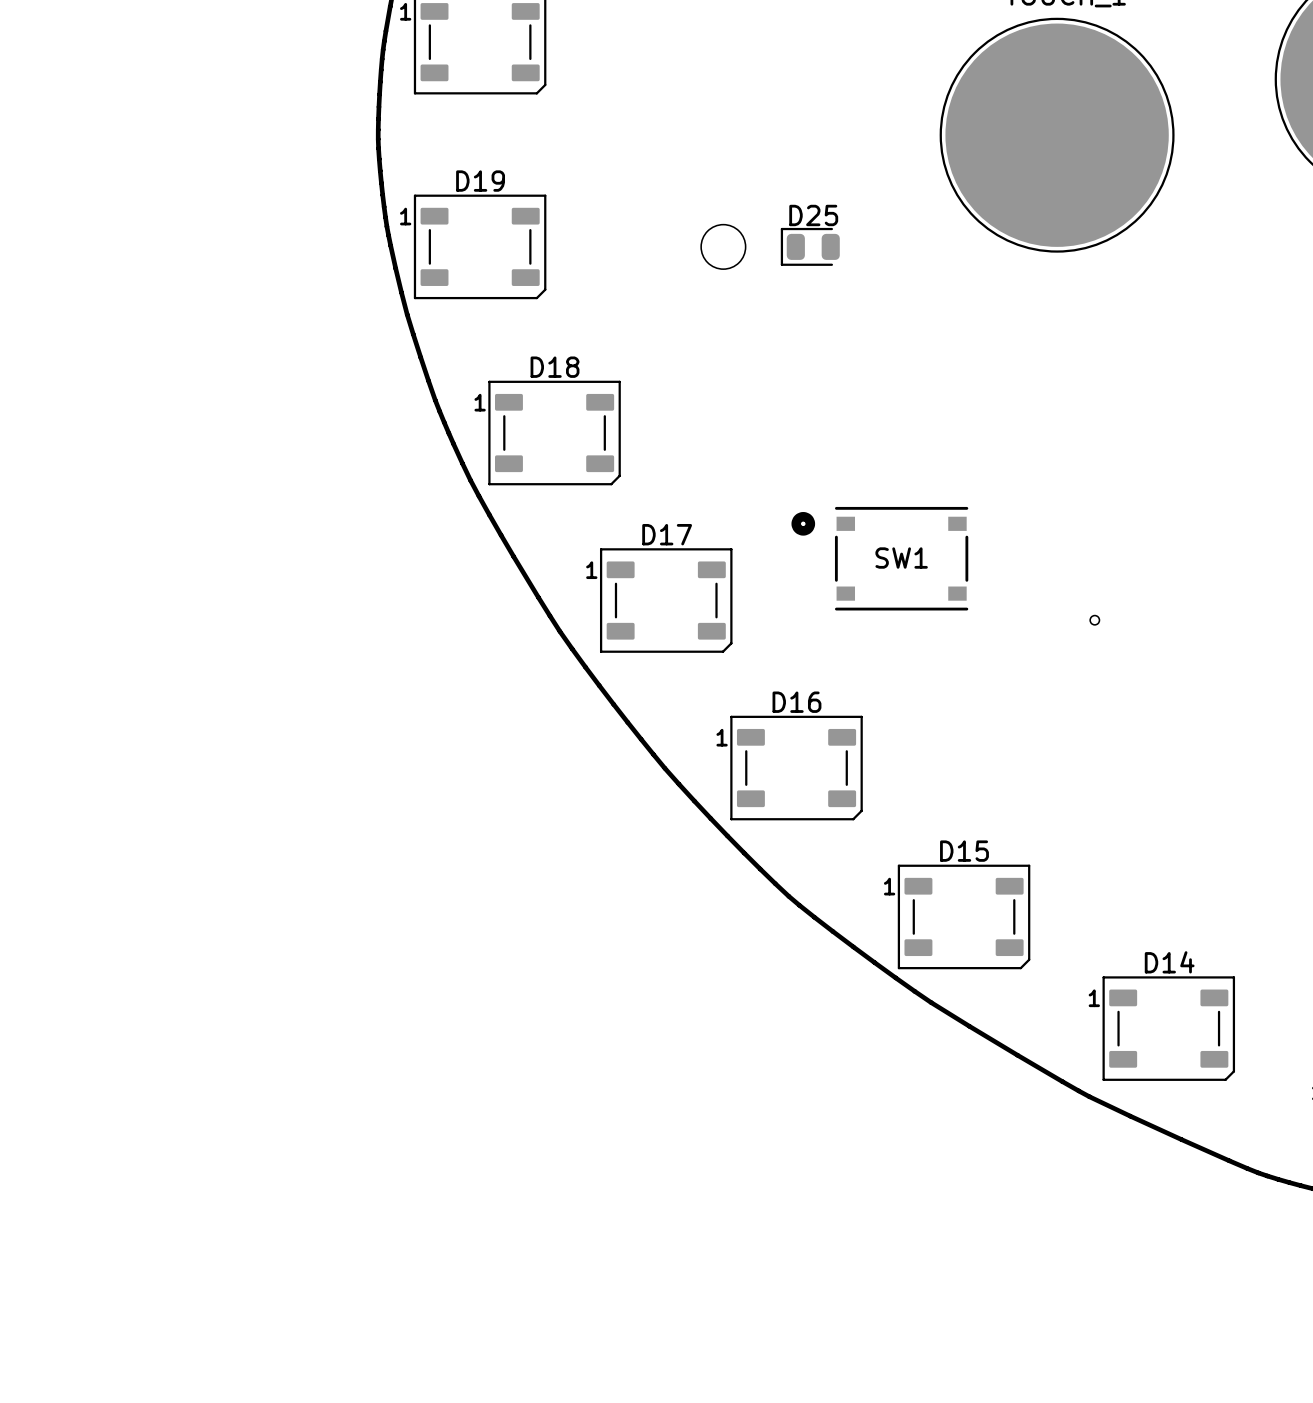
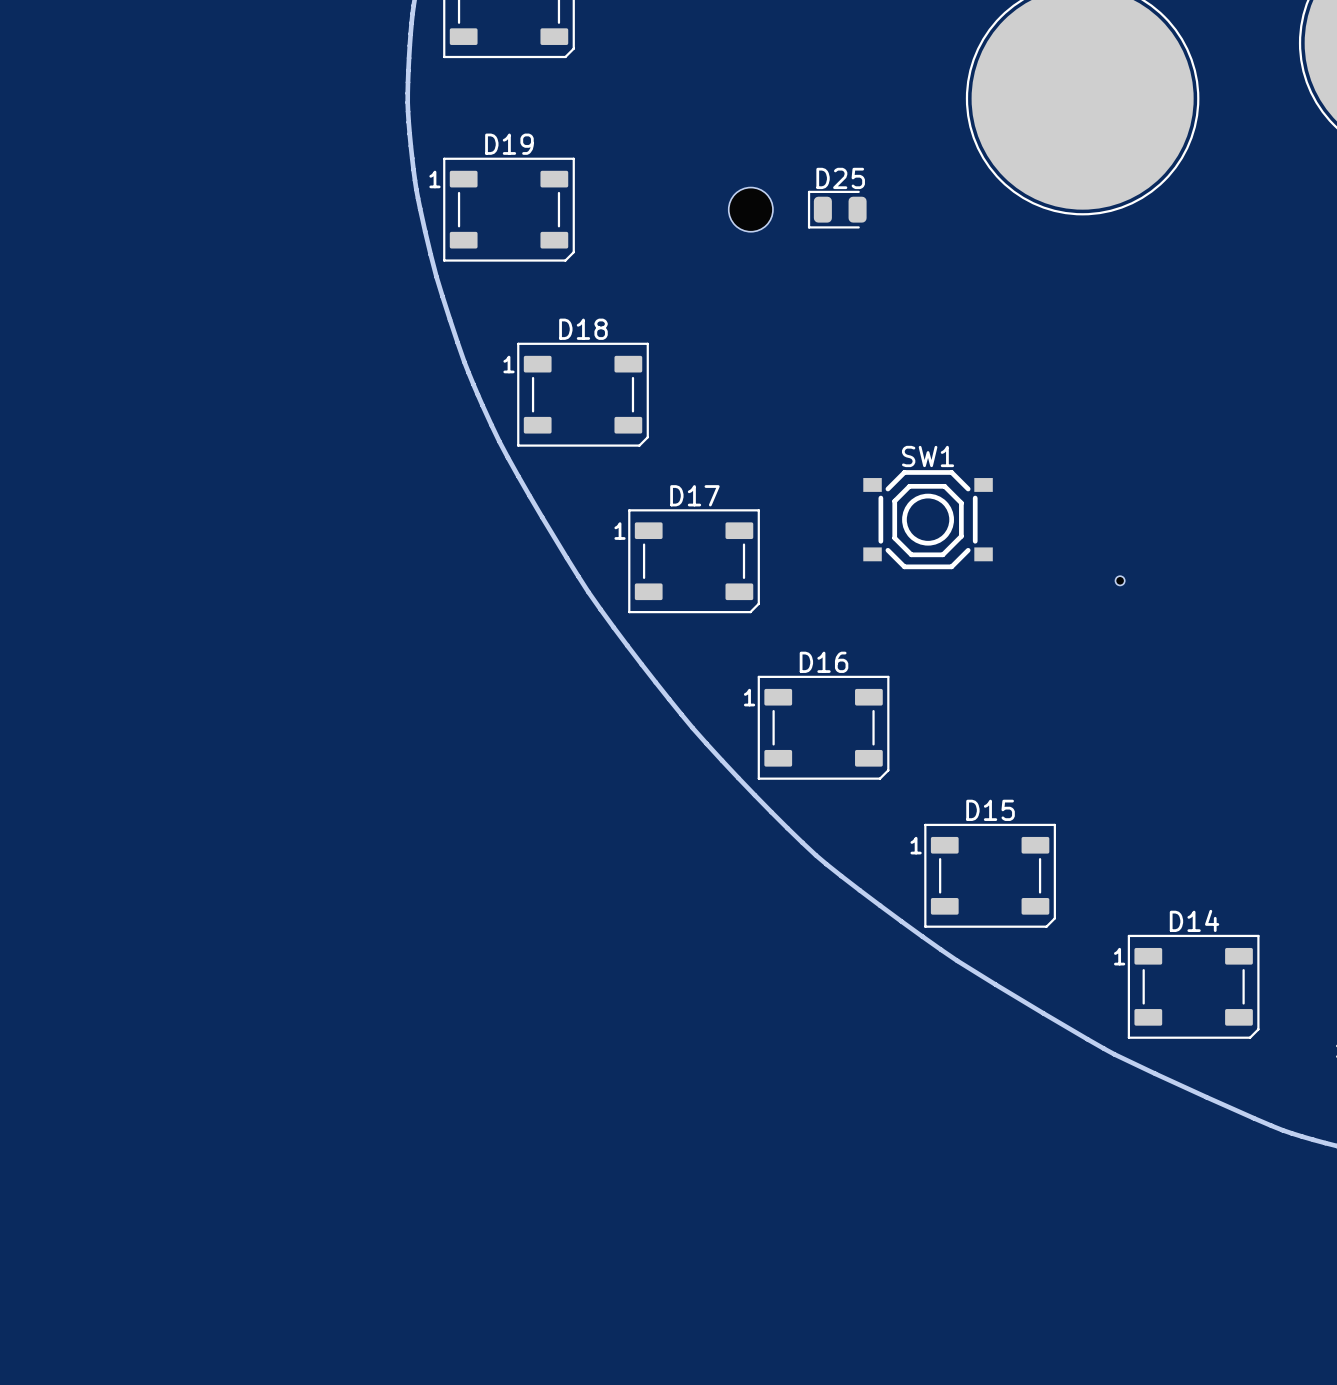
SW1 footprint: [791, 506, 969, 611] -> [863, 470, 993, 570]
SW1 name position: SW1 (901, 558) -> SW1 (928, 456)

